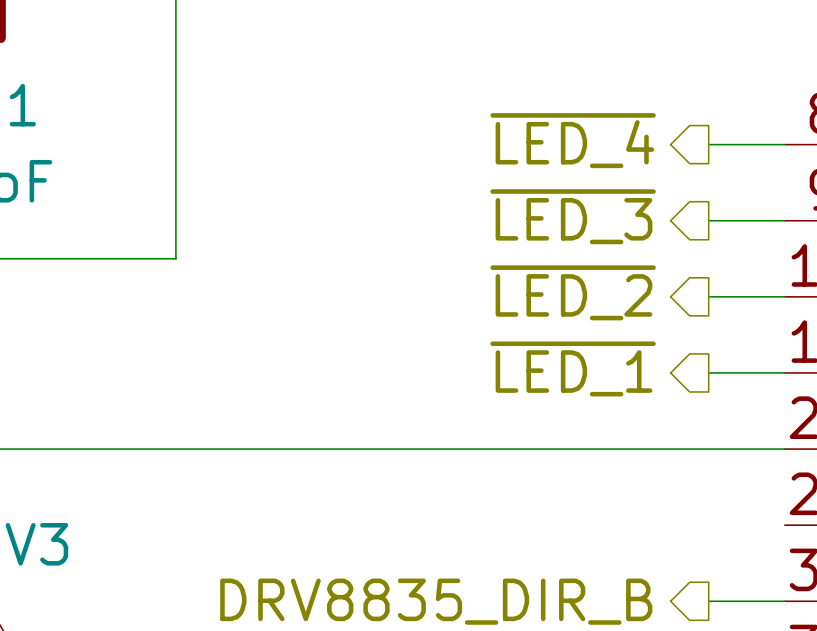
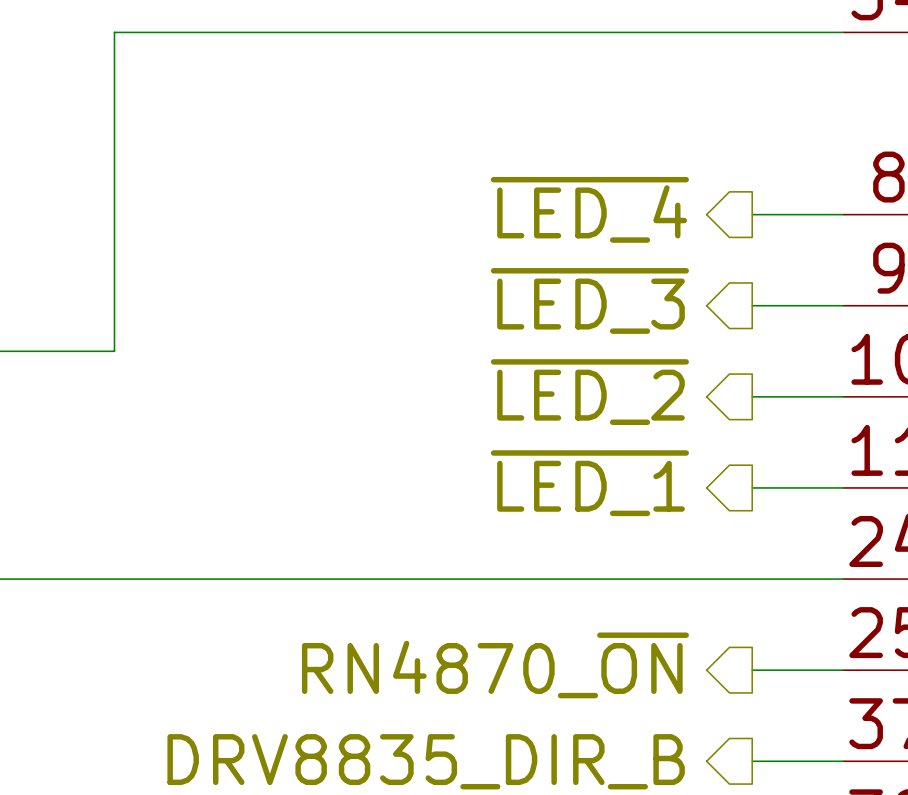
hierarchical label: none -> RN4870_~{ON} (495, 665)
wire: none -> (752, 670) (843, 670)

